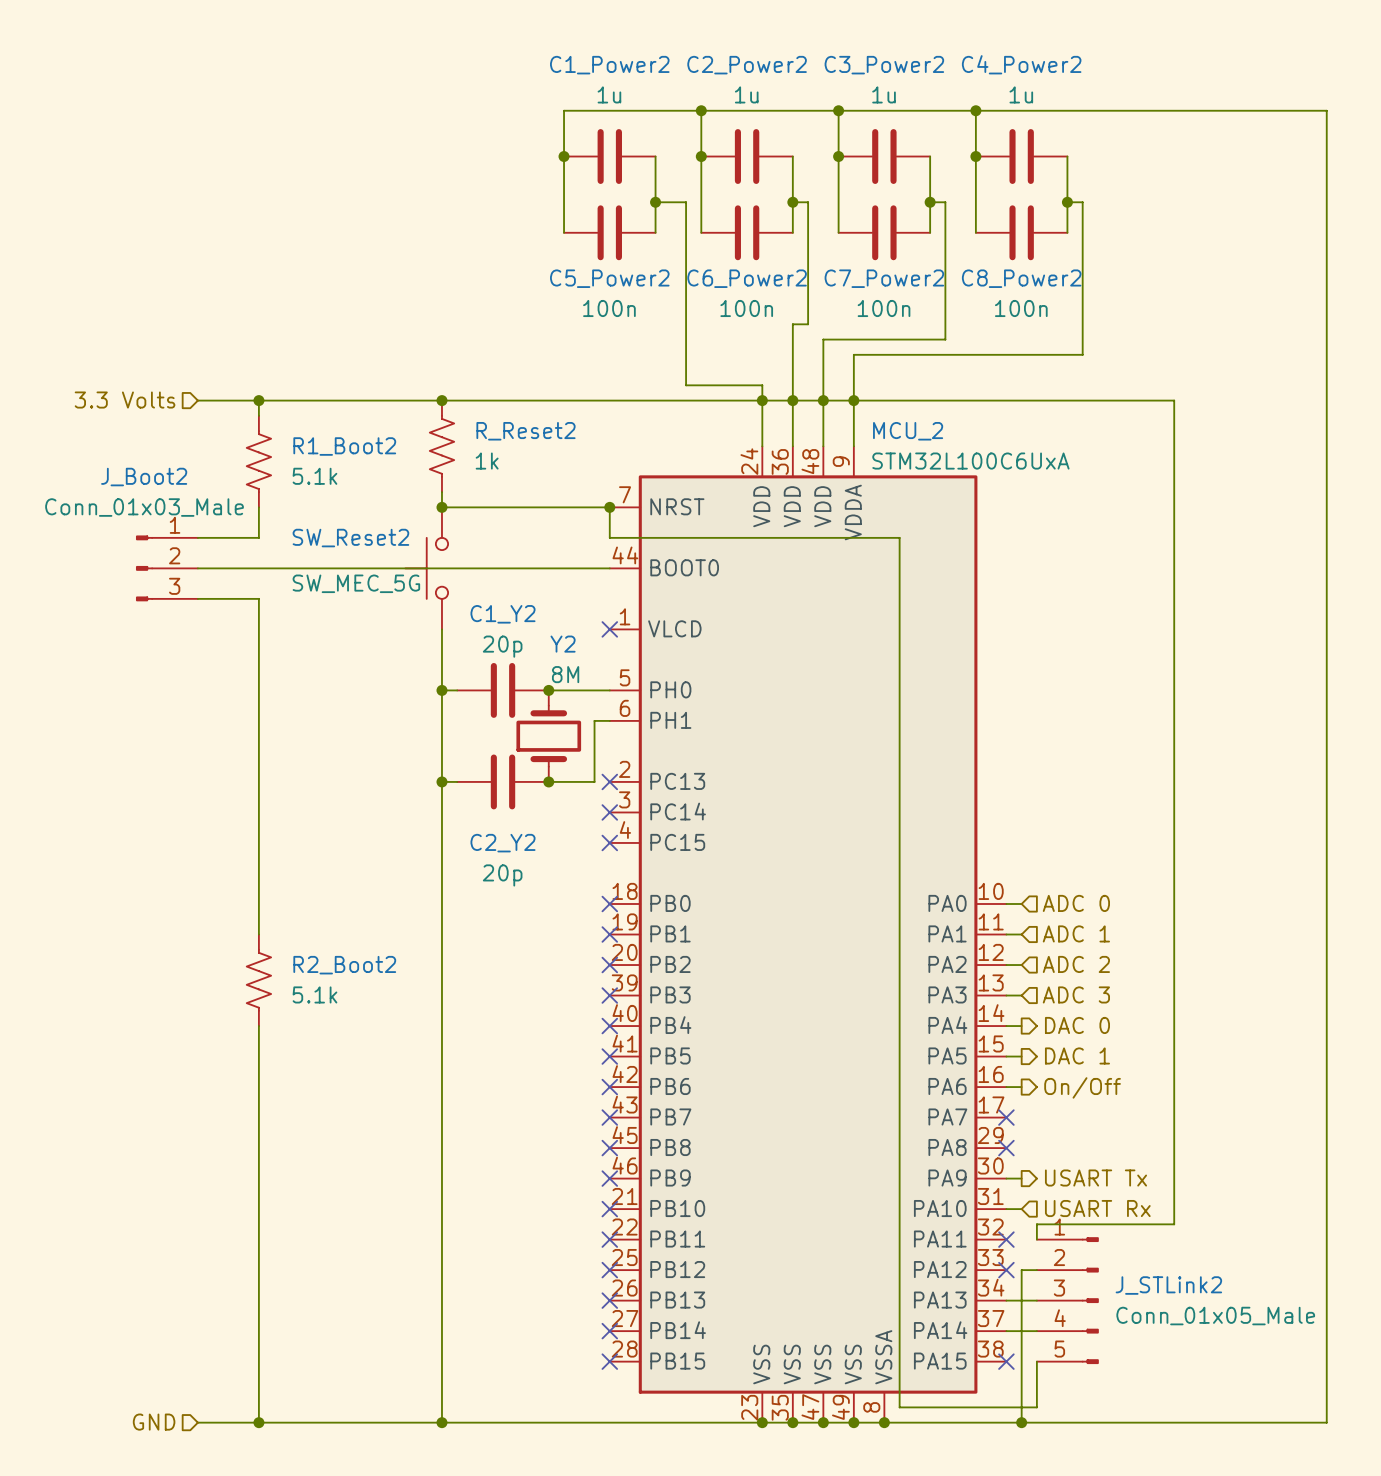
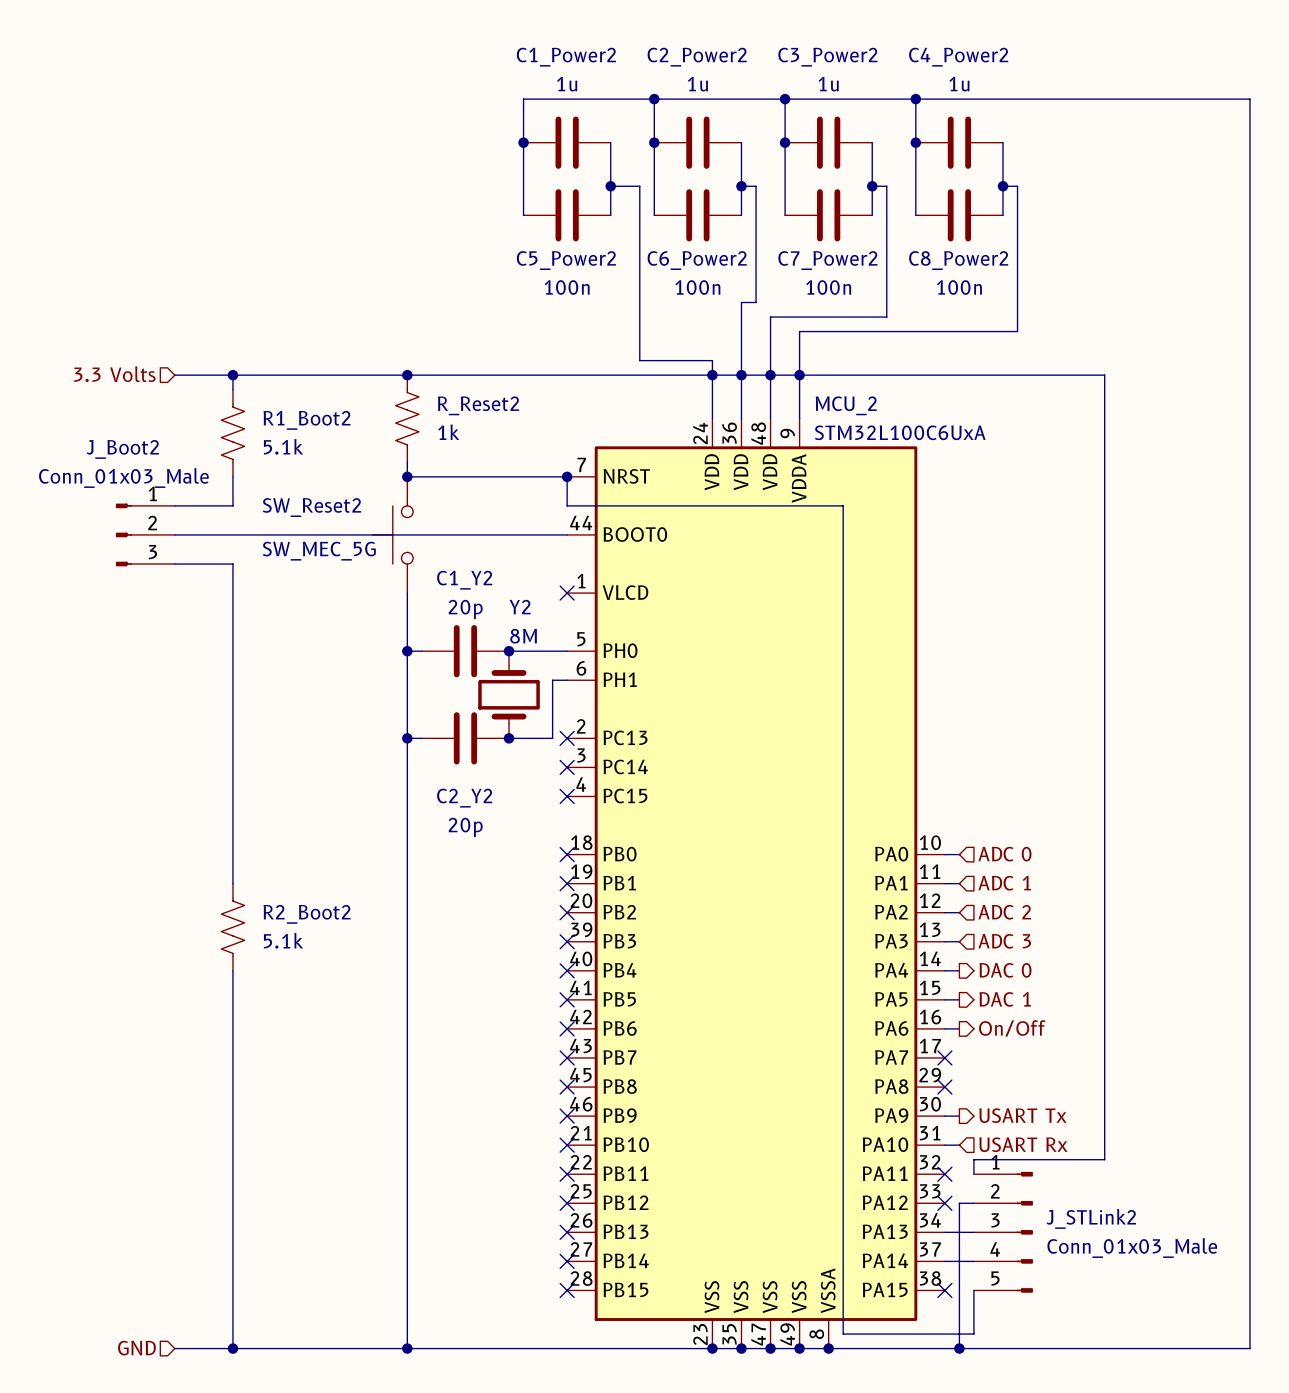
J_STLink2 value: Conn_01x05_Male (1215, 1316) -> Conn_01x03_Male (1132, 1248)

